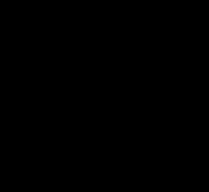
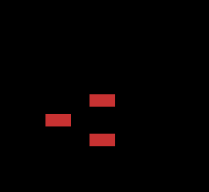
part: none -> (80, 120)

